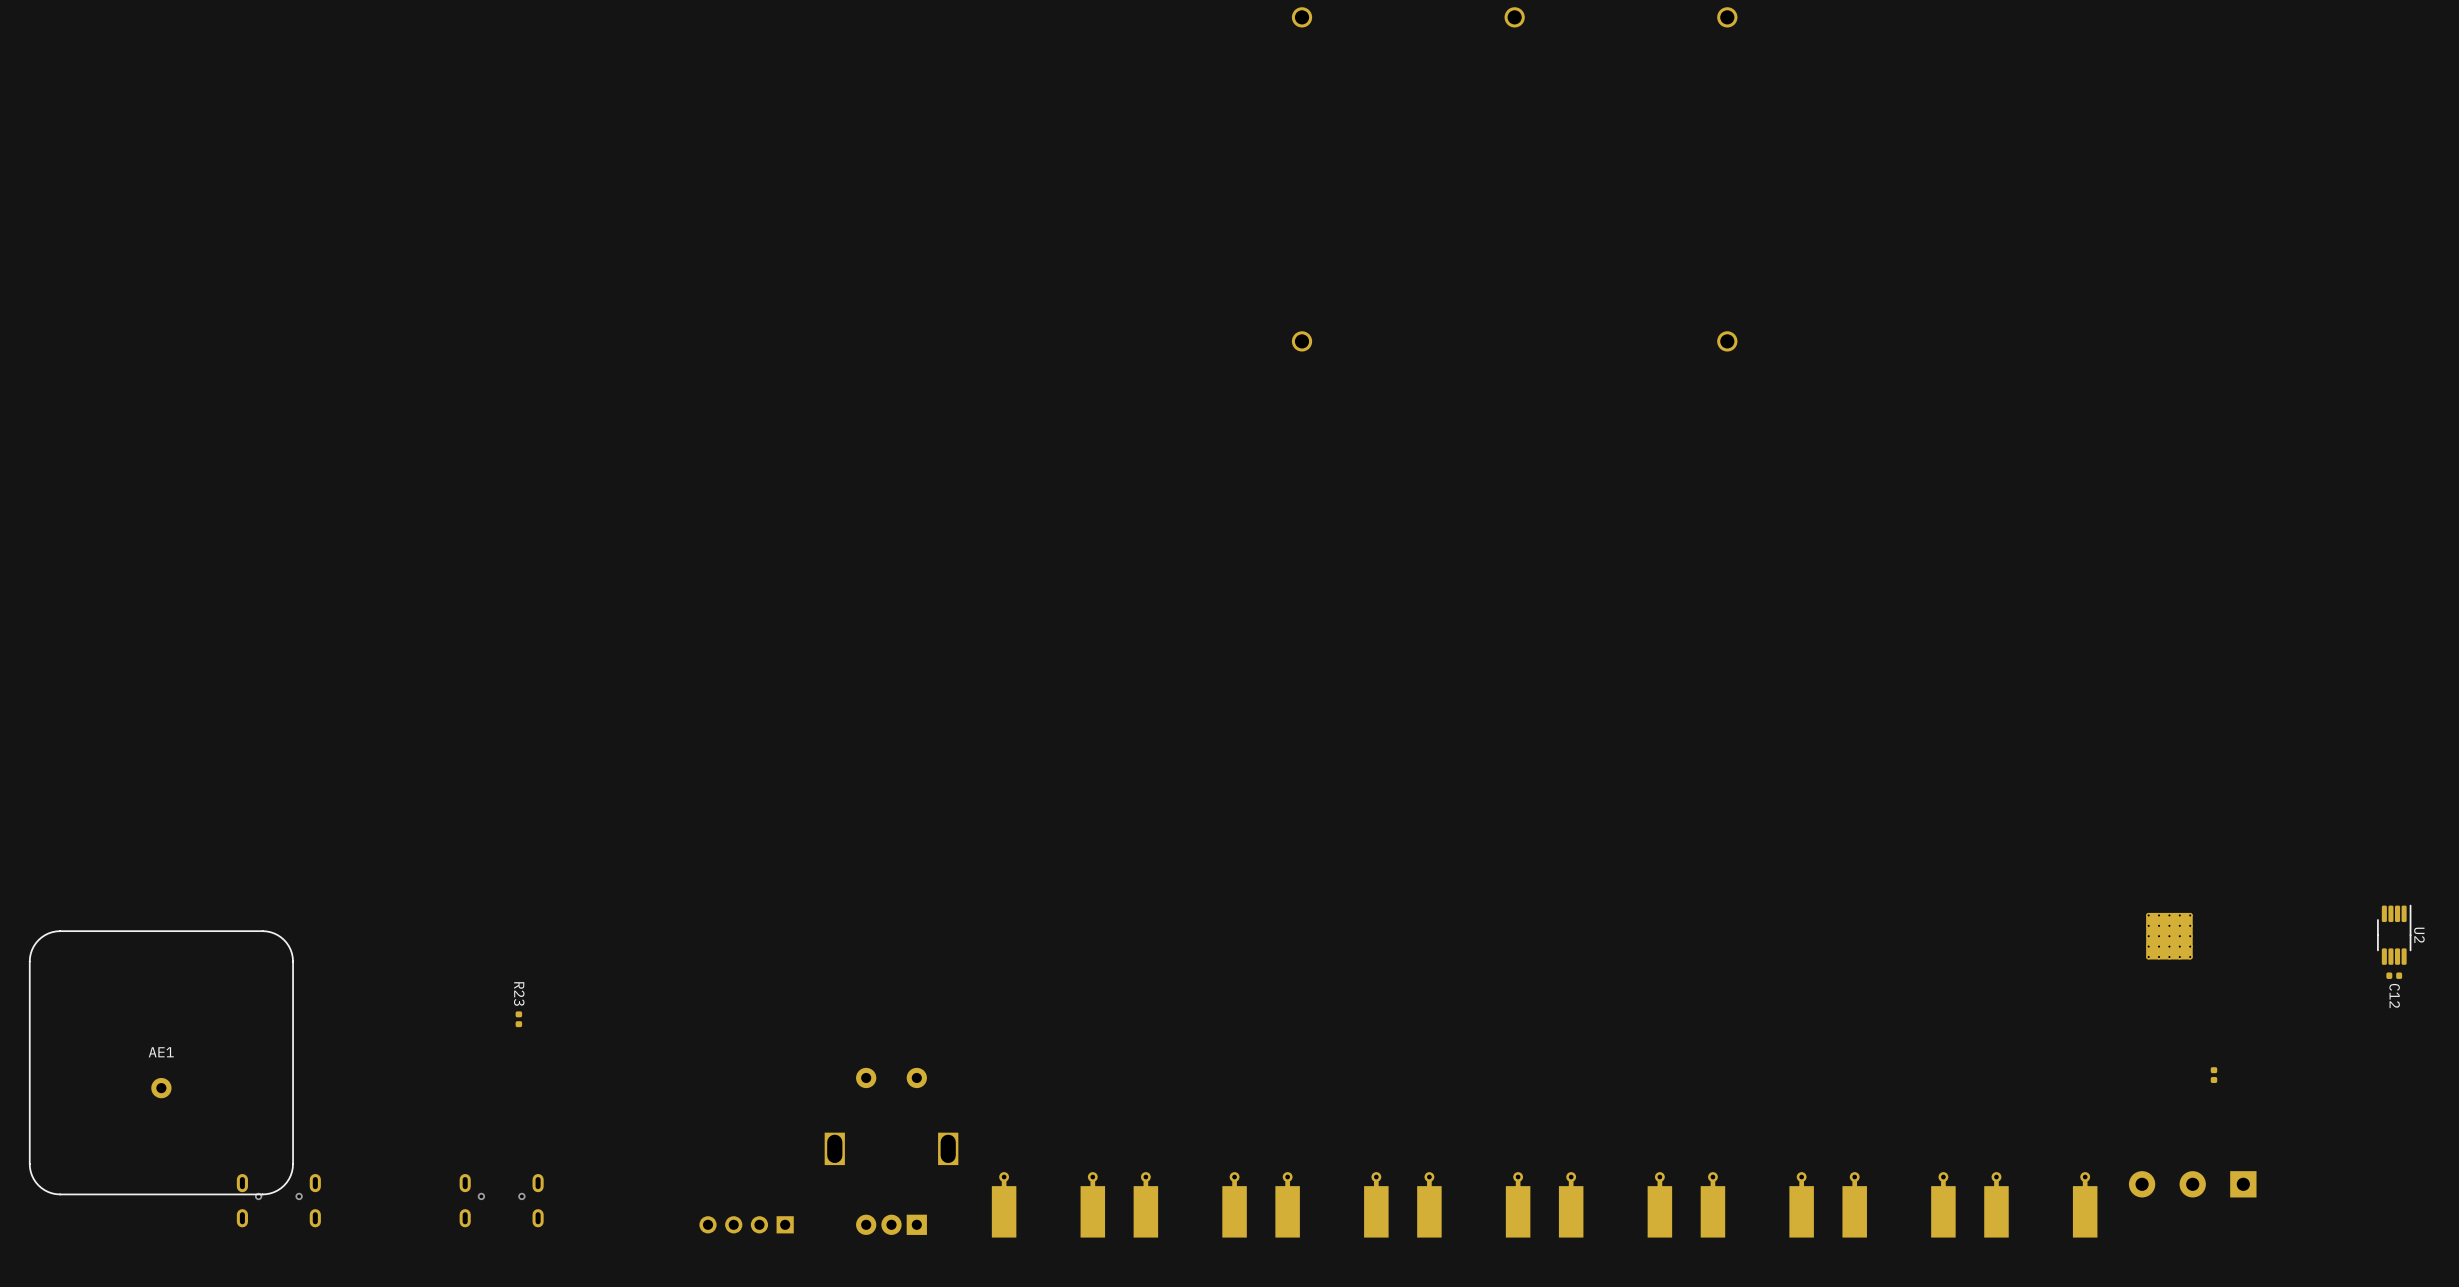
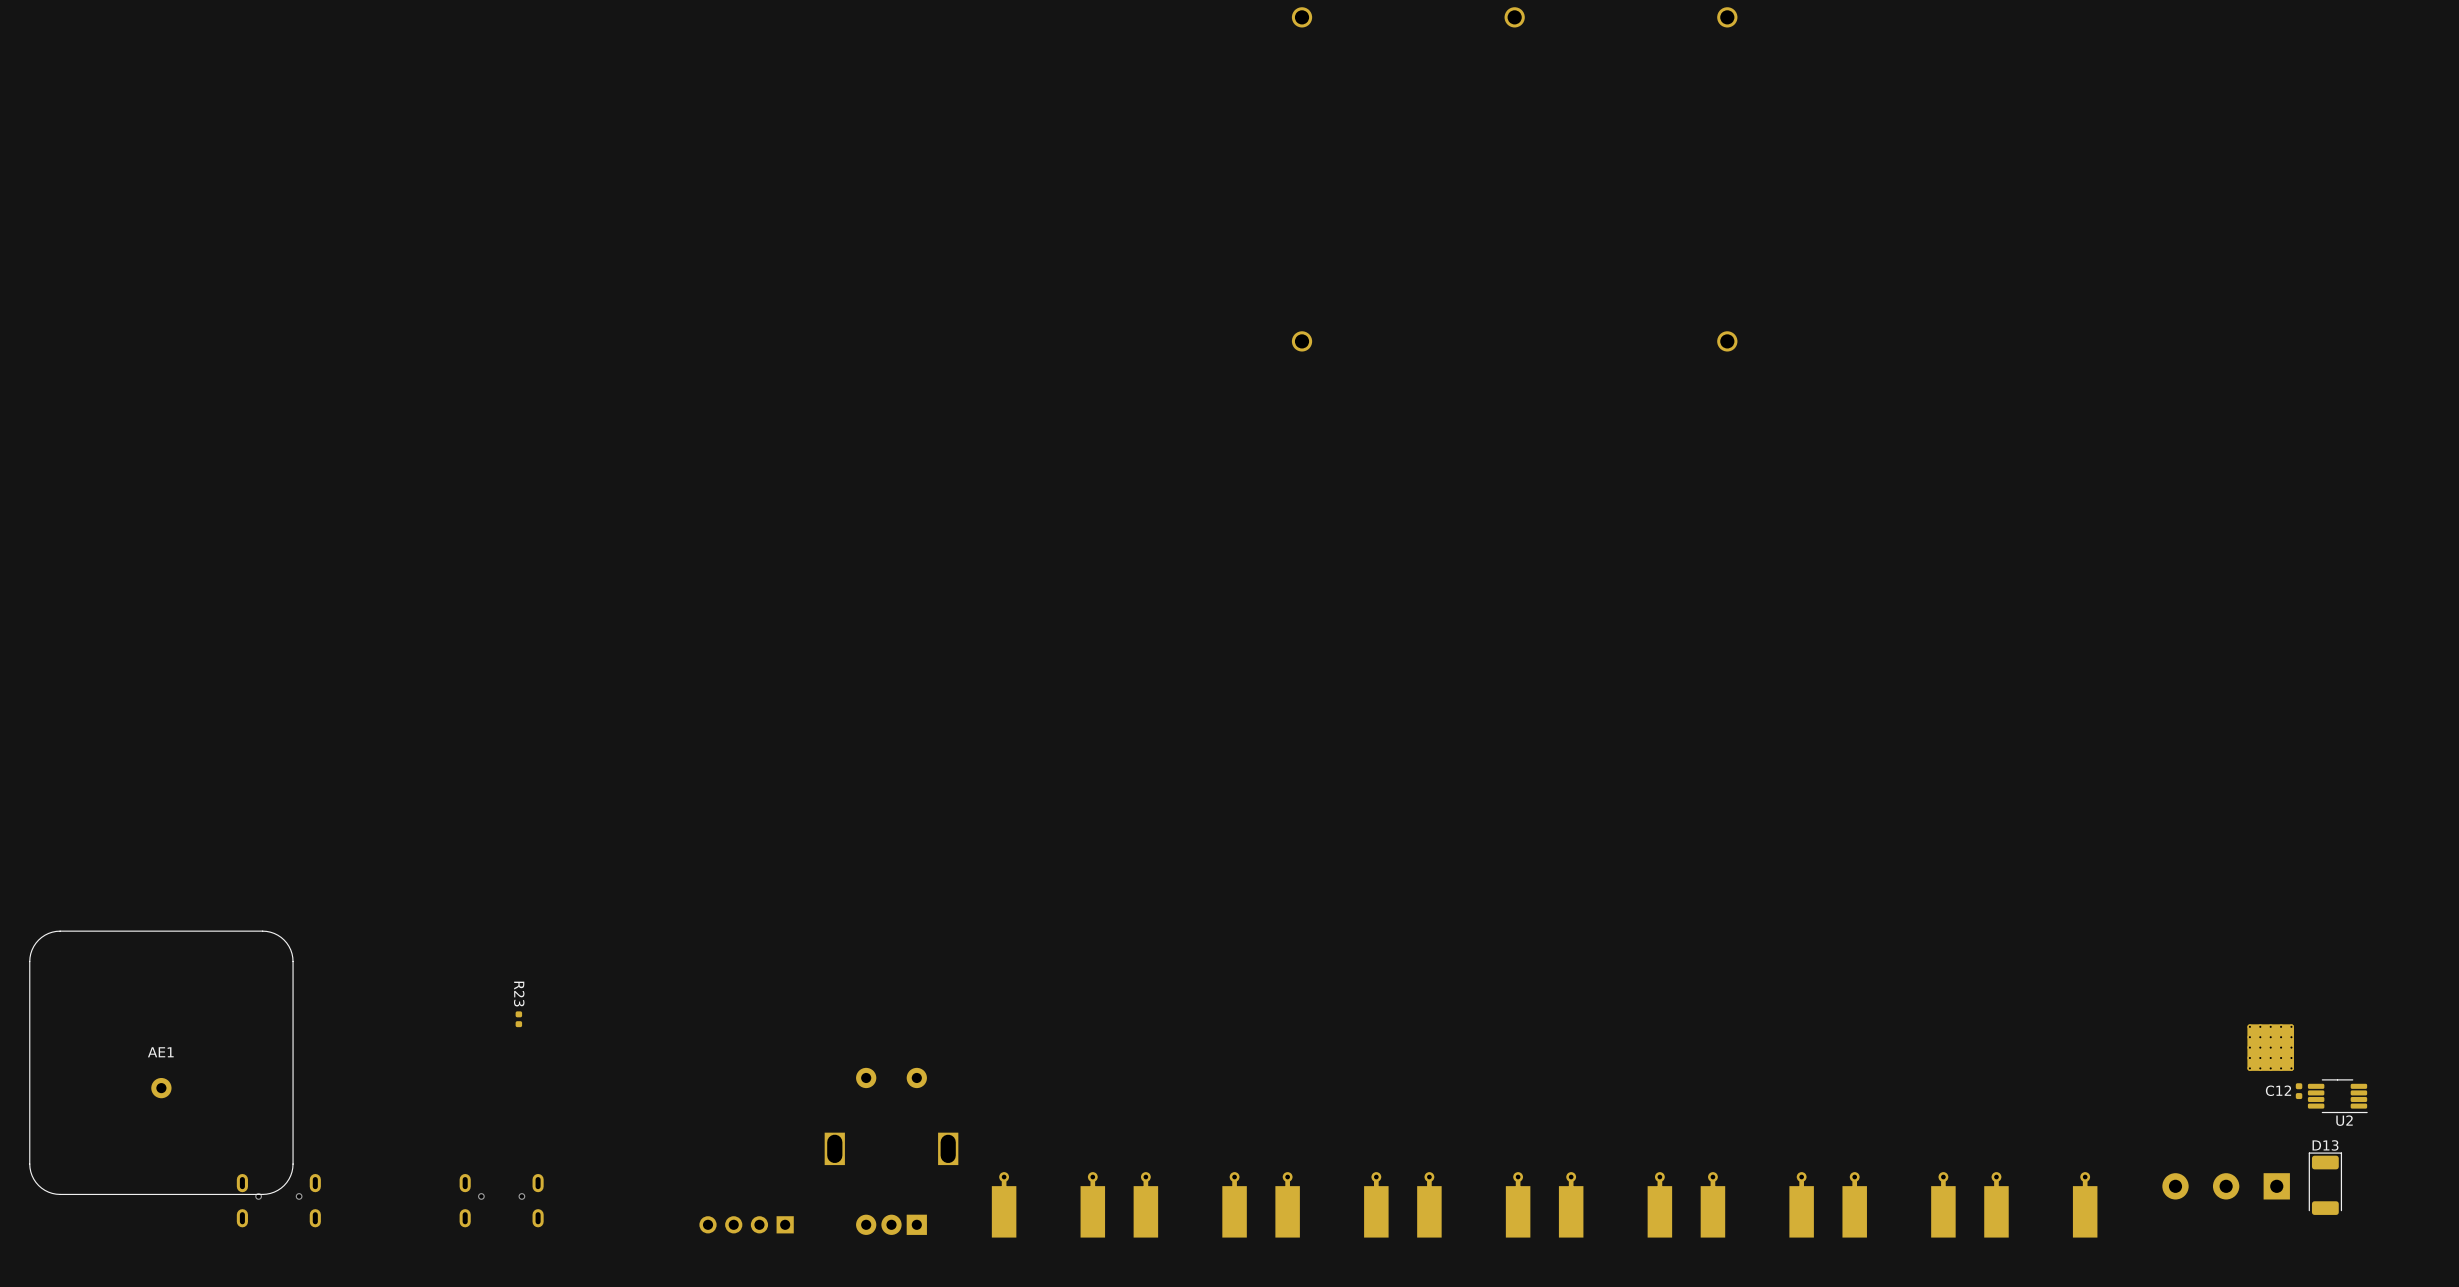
U2 rotation: 0° (2394, 934) -> 90° clockwise (2337, 1096)
U2 position: (2394, 934) -> (2337, 1096)
part position: (2169, 936) -> (2270, 1047)
C12 rotation: 0° (2394, 975) -> 90° clockwise (2299, 1091)
C12 position: (2394, 975) -> (2299, 1091)
part: (2213, 1075) -> none
D13: none -> (2325, 1183)
part position: (2192, 1184) -> (2226, 1186)

